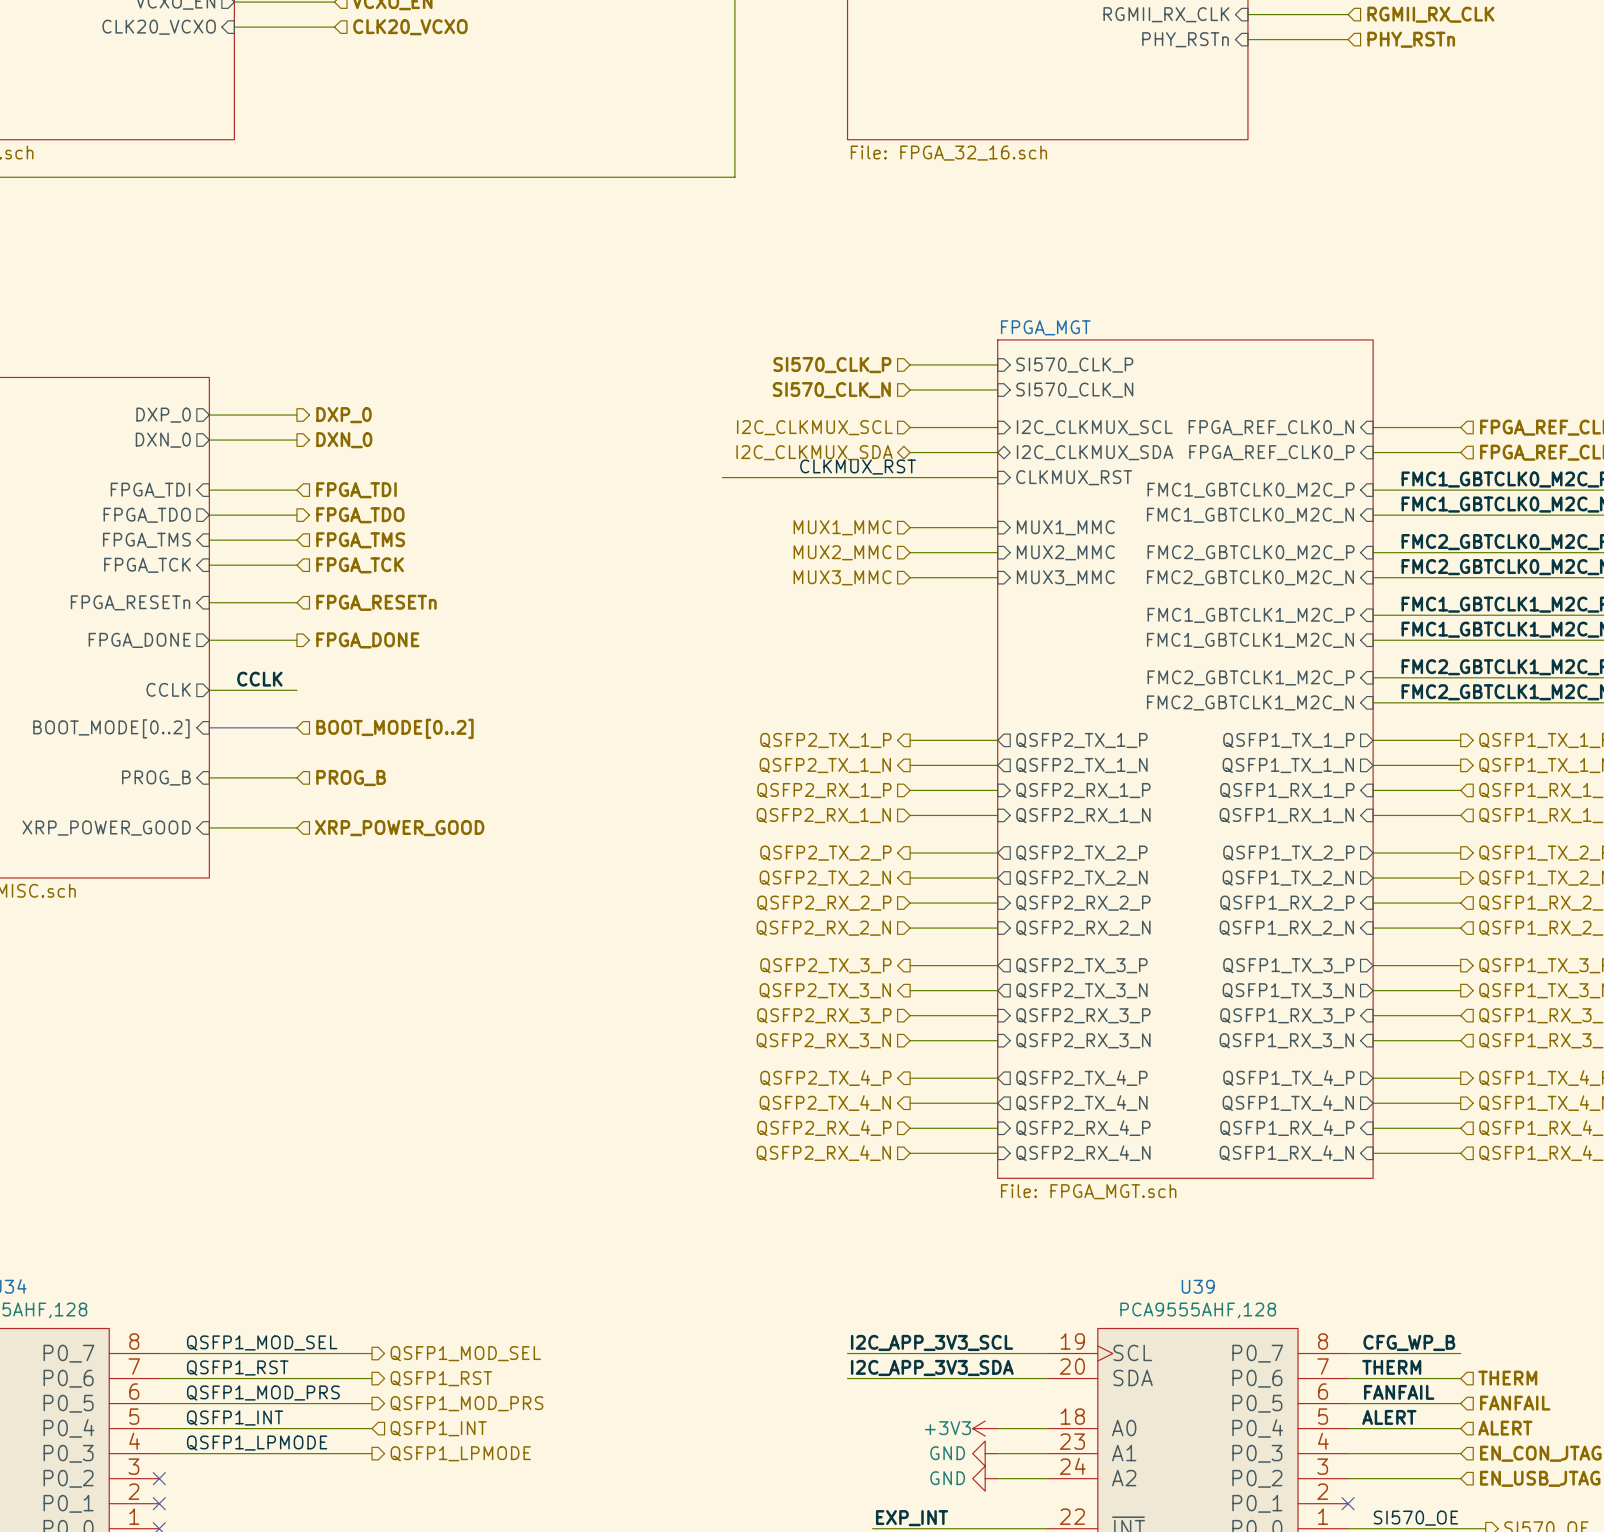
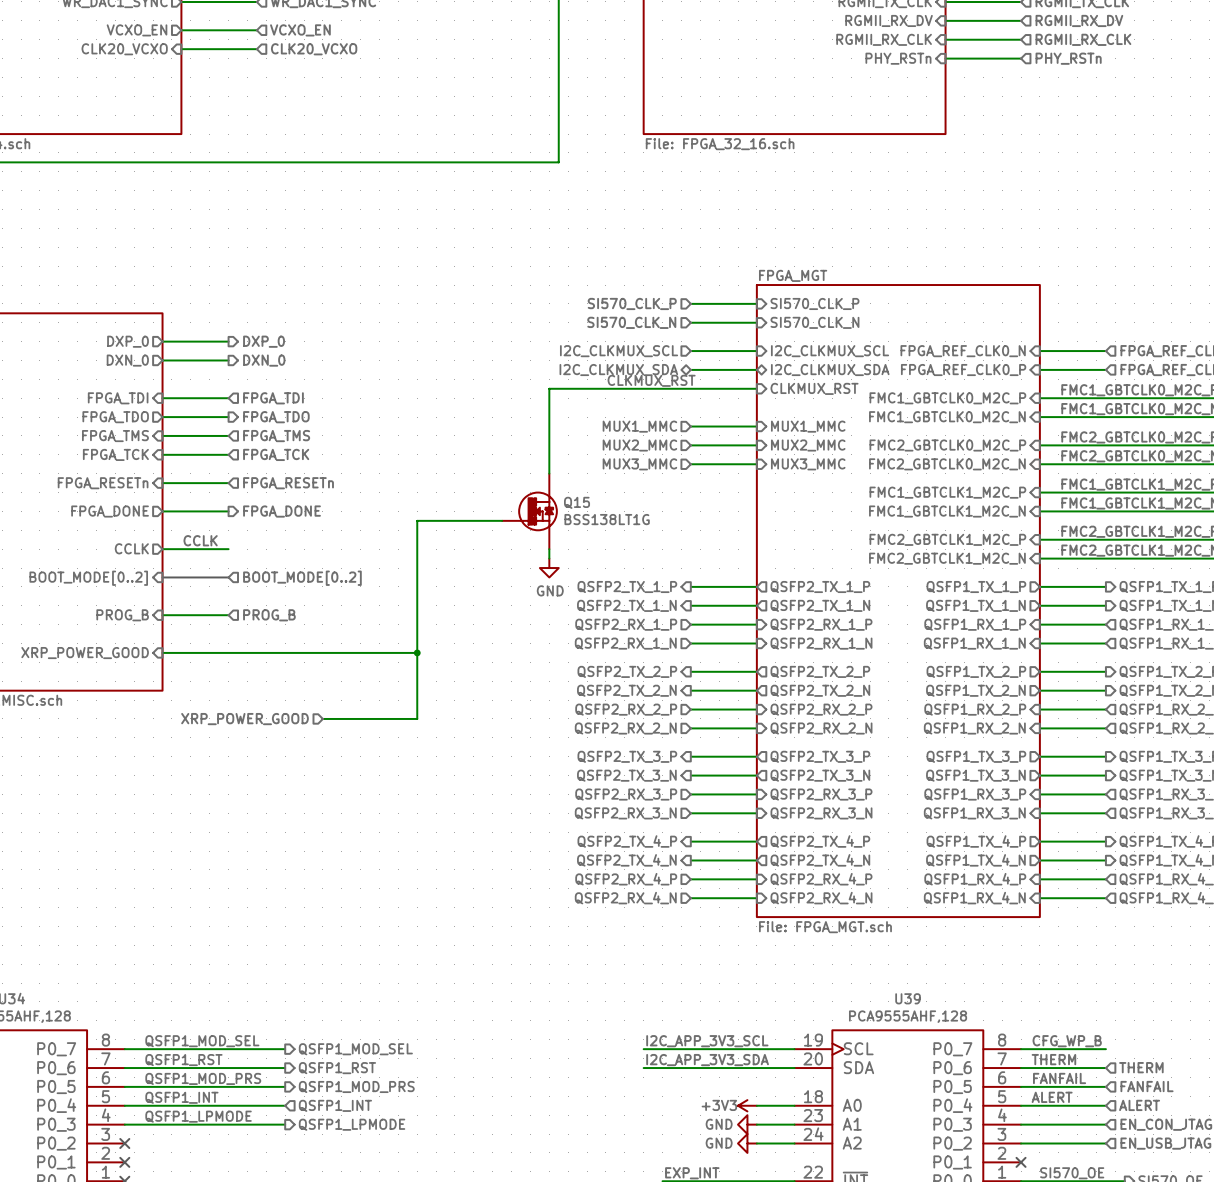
wire: none -> (549, 388) (549, 473)
Q15: none -> BSS138LT1G (529, 511)
wire: none -> (502, 520) (417, 520) (417, 718) (322, 718)
wire: none -> (549, 549) (549, 558)
power symbol: none -> GND (549, 568)
wire: none -> (228, 652) (417, 652)
junction: none -> (417, 652)
hierarchical label rotation: 0° (399, 828) -> 180° (245, 719)

